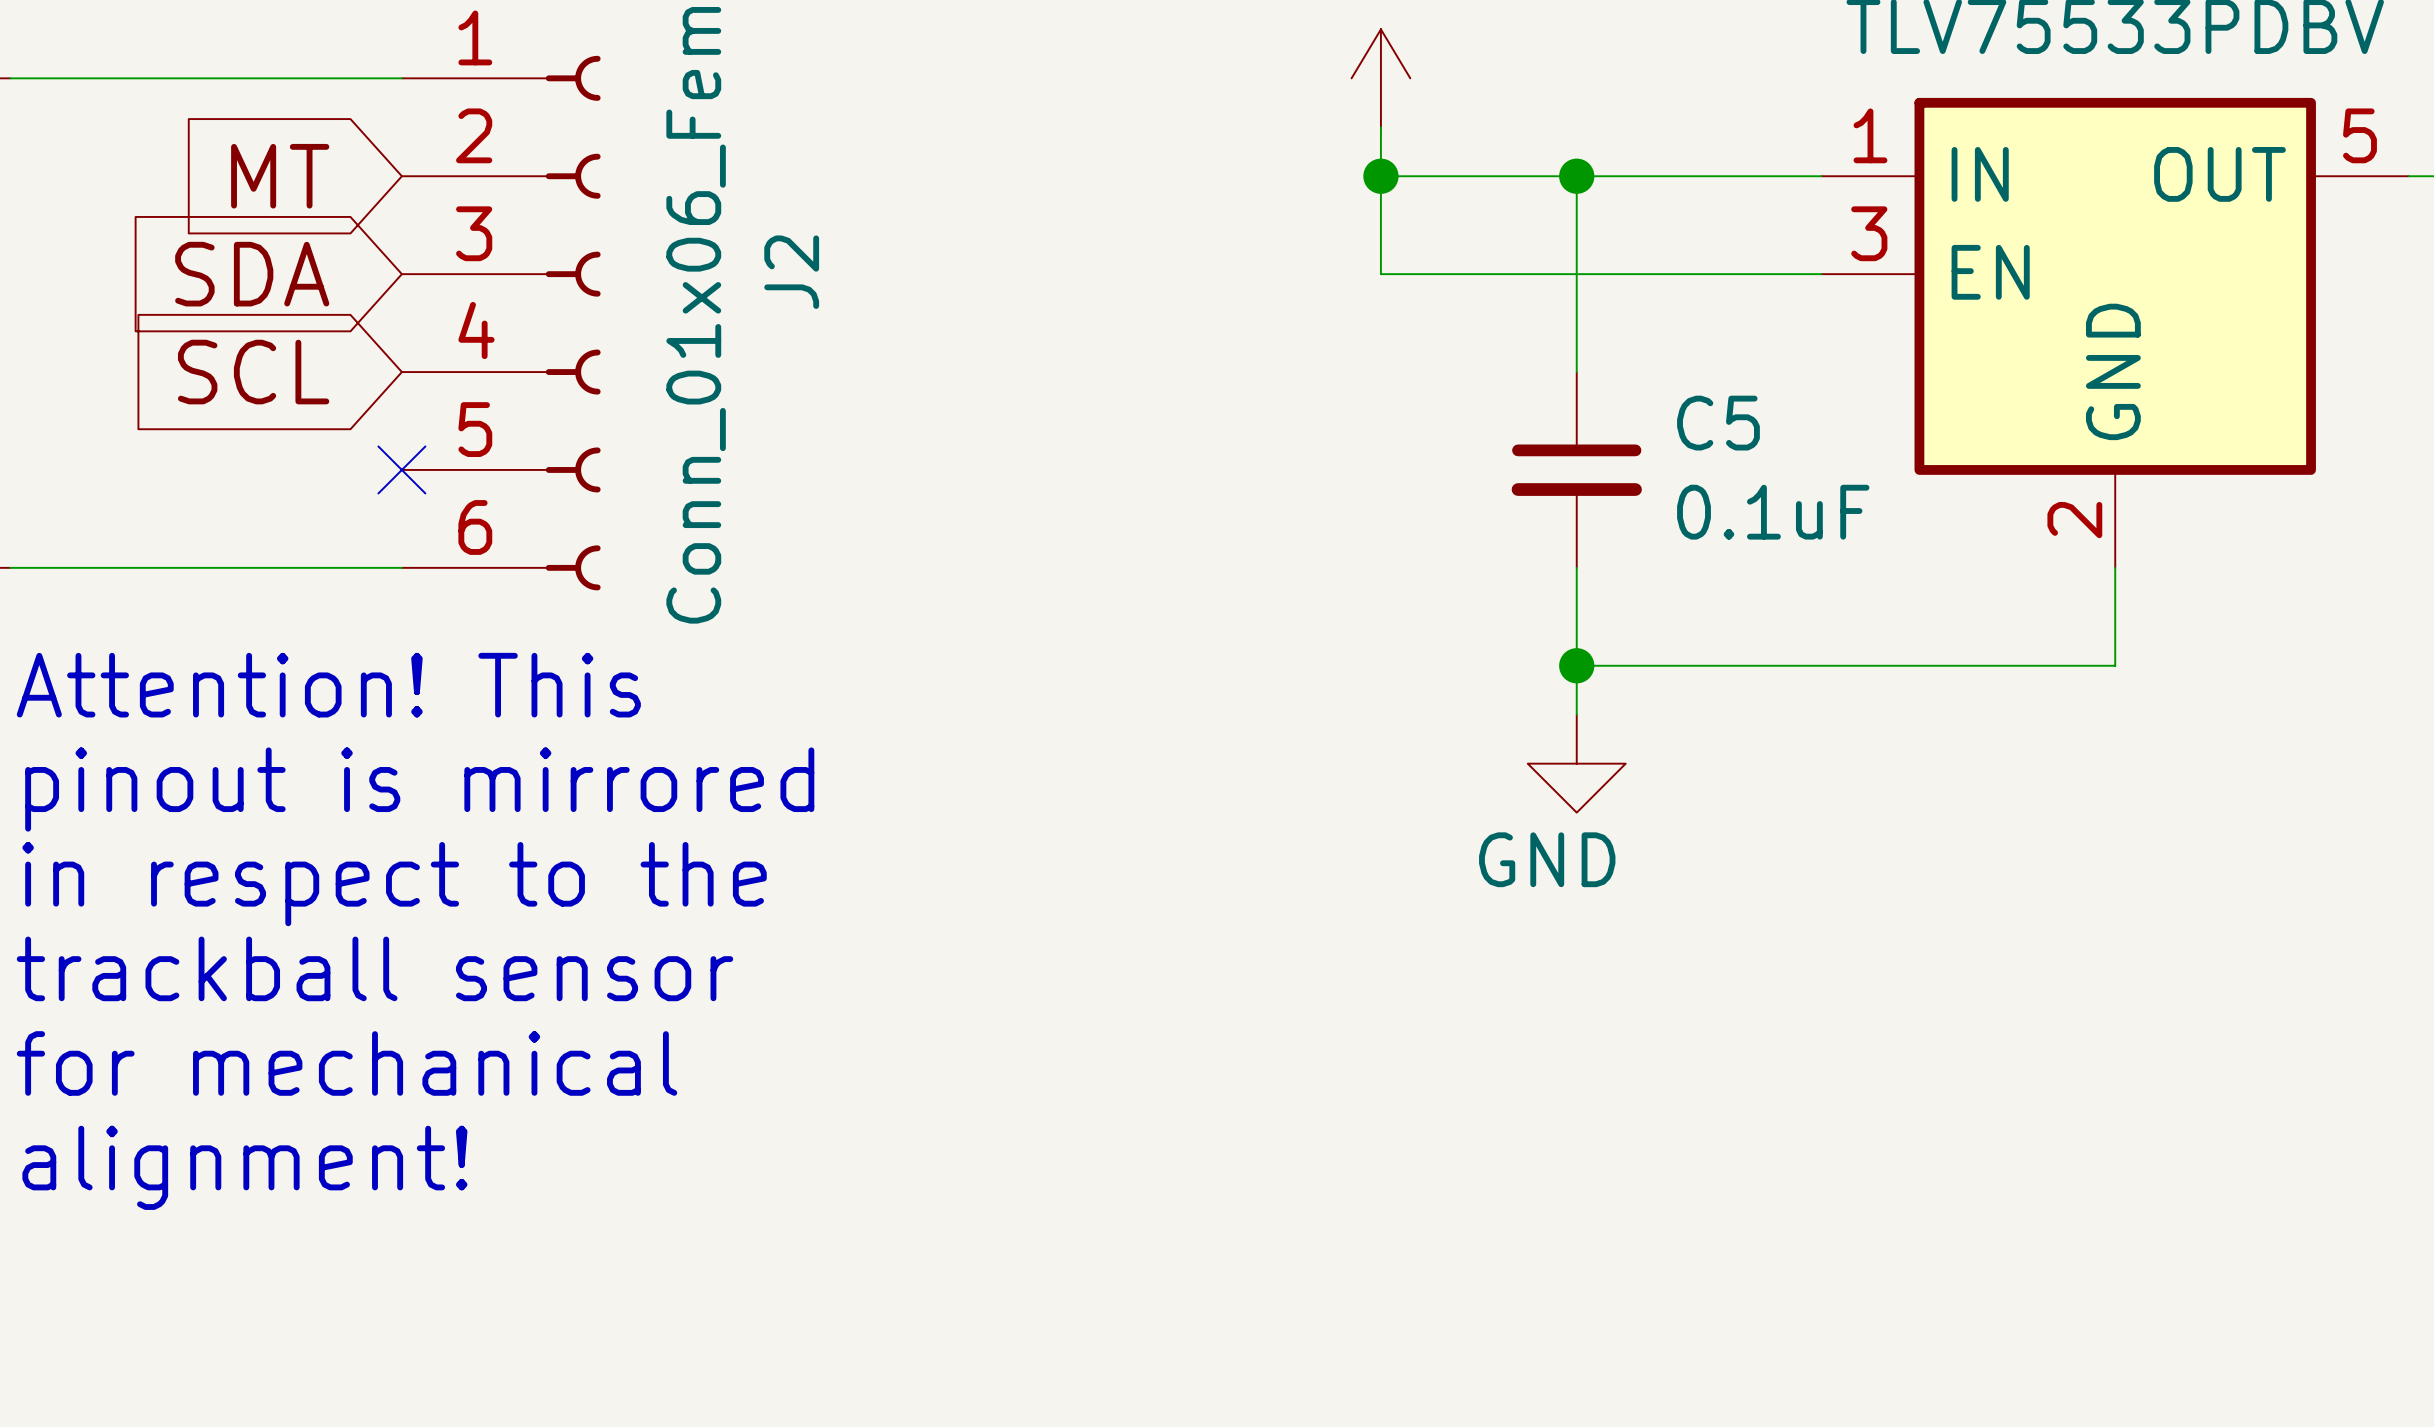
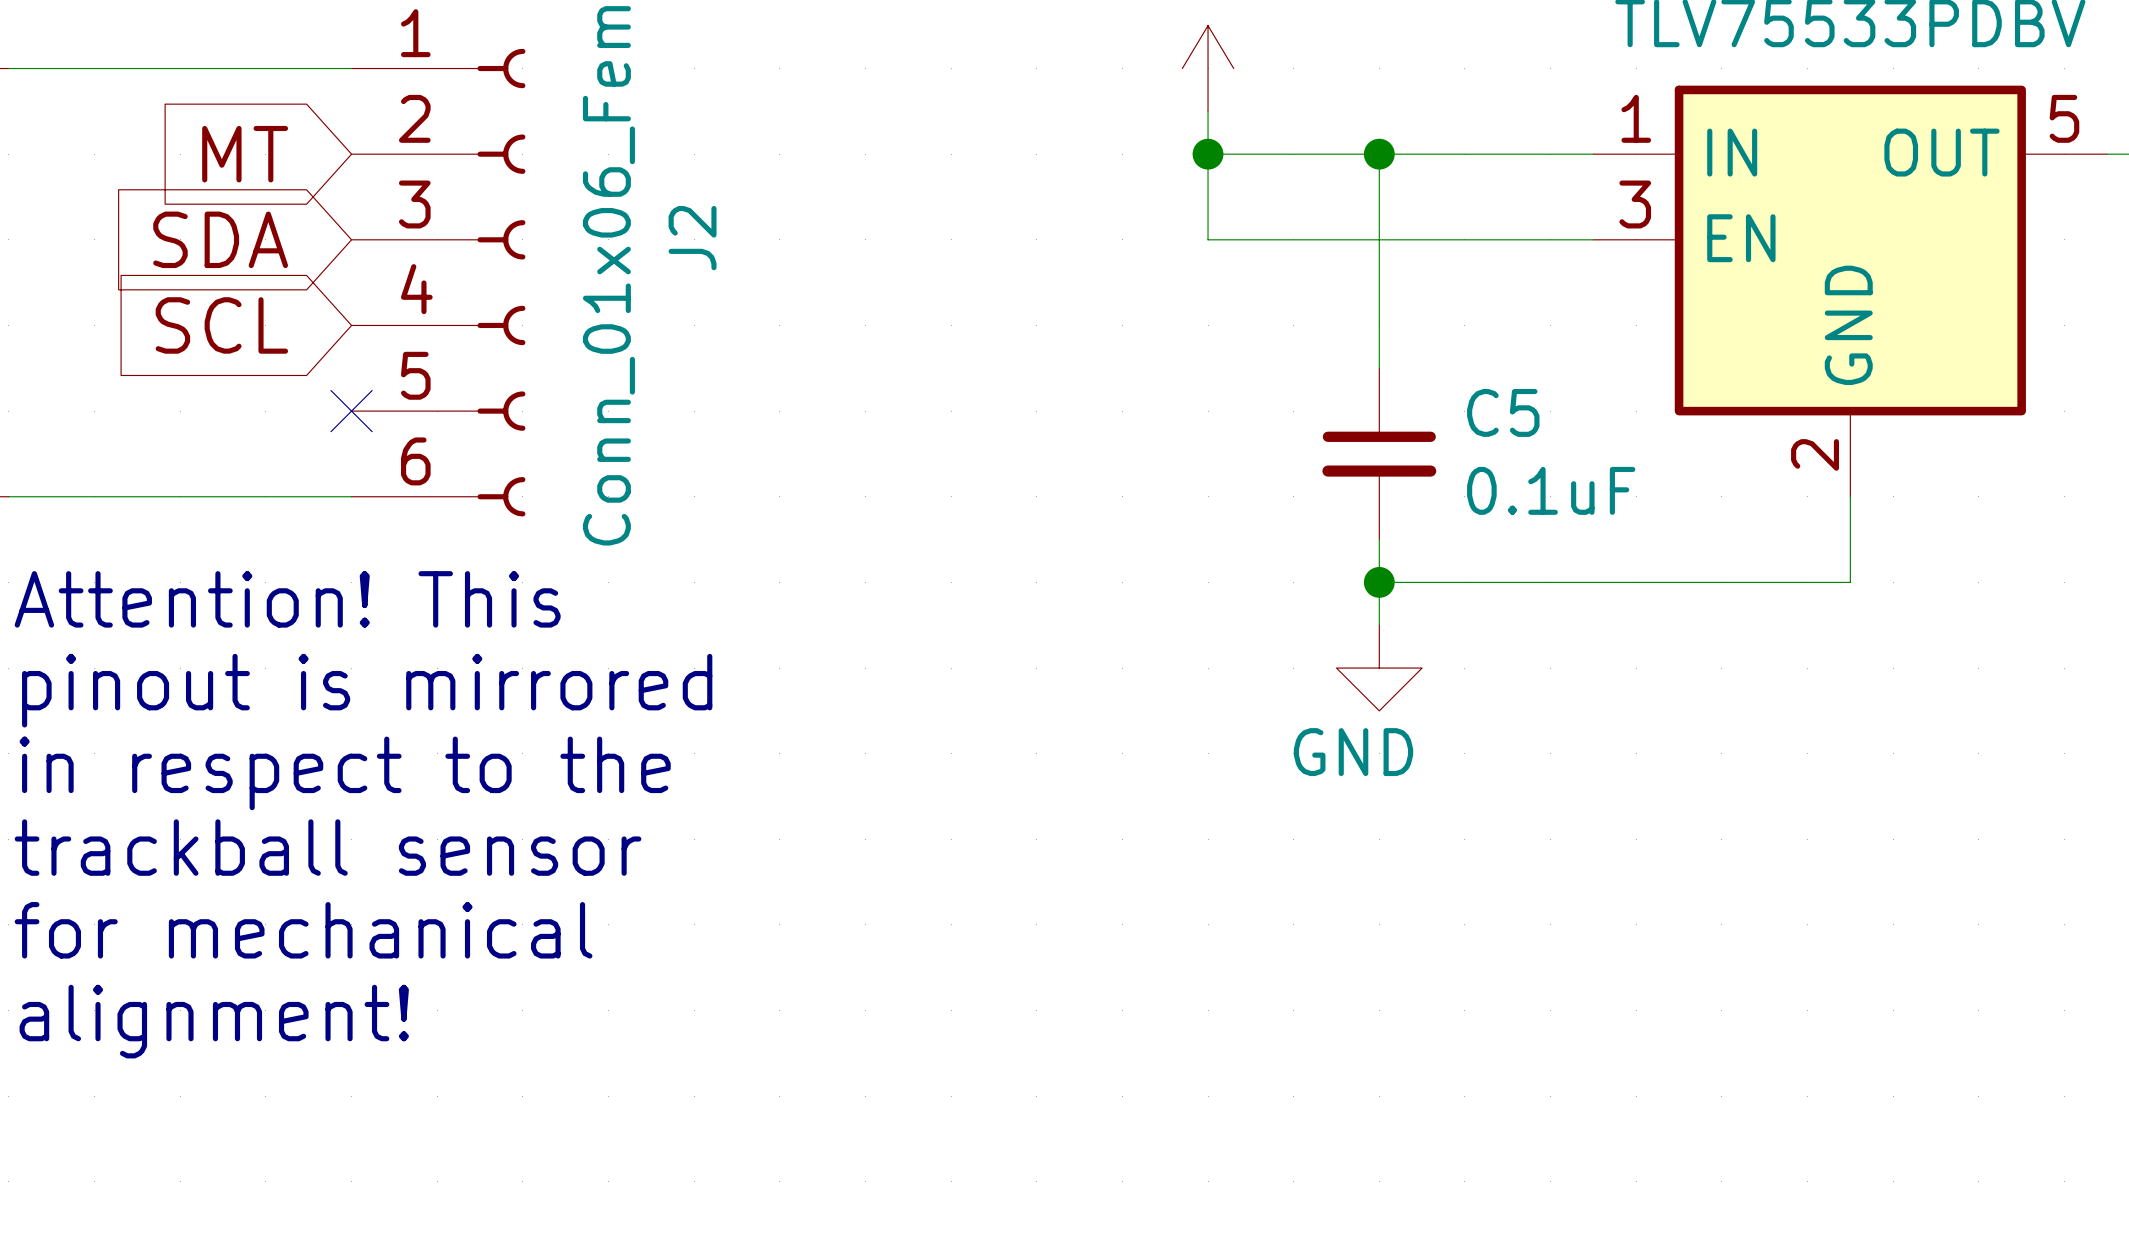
C5 position: (1576, 469) -> (1379, 453)

